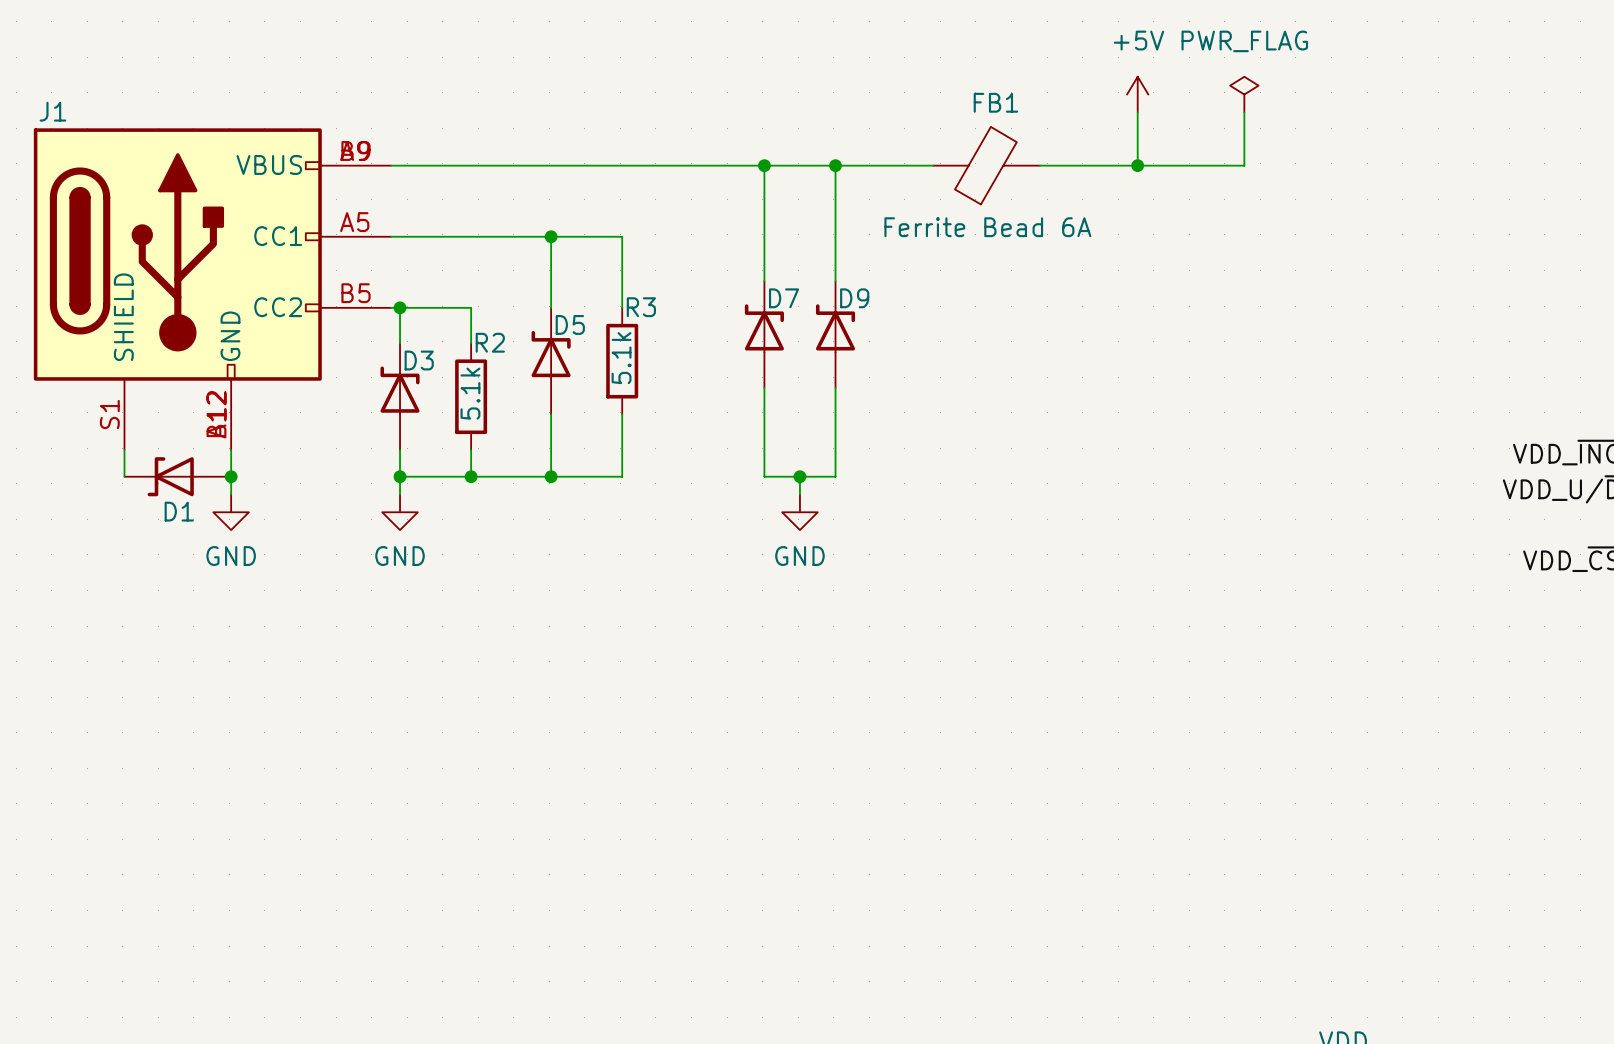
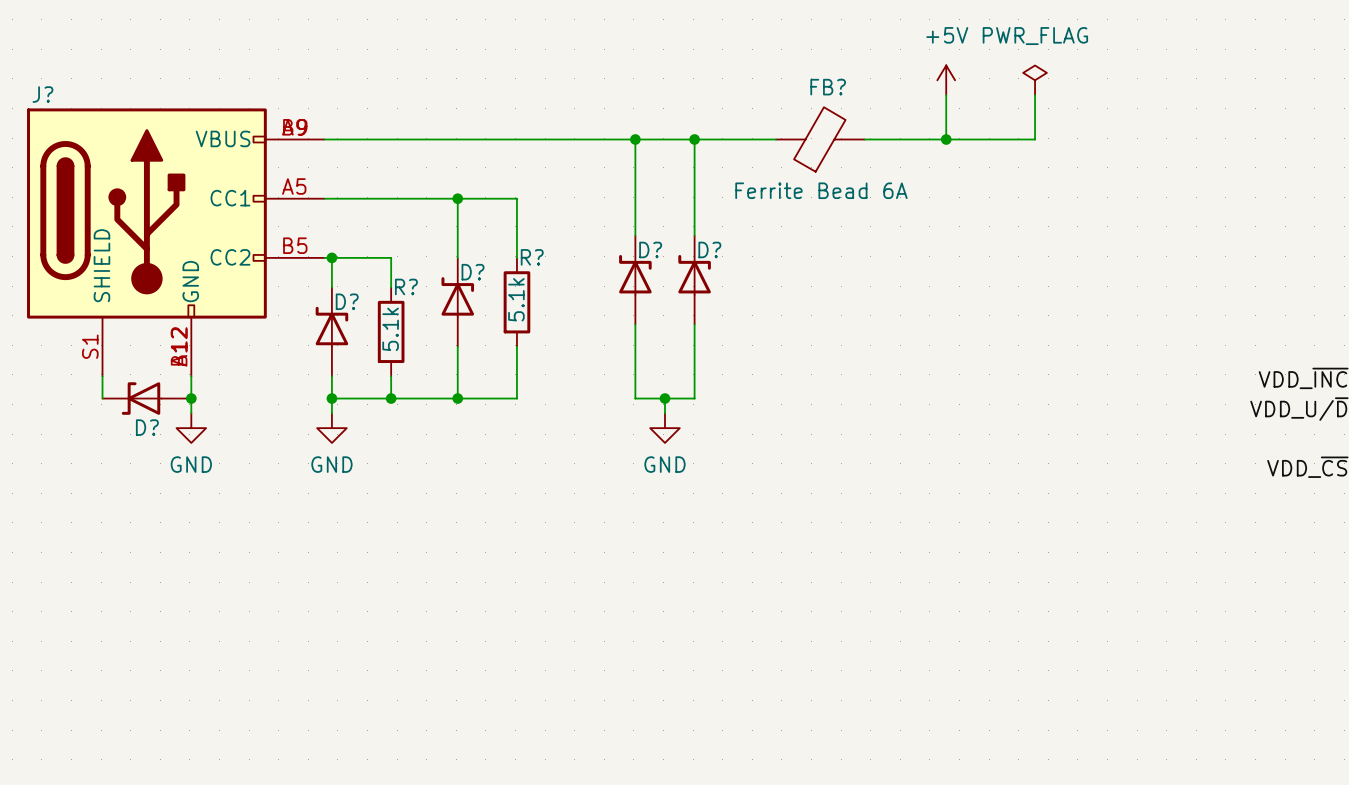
FB1 name: FB1 (995, 102) -> FB? (828, 87)
J1 name: J1 (52, 111) -> J? (42, 94)
D7 name: D7 (784, 298) -> D? (650, 249)
D9 name: D9 (854, 298) -> D? (709, 249)
R3 name: R3 (641, 307) -> R? (532, 257)
D5 name: D5 (570, 324) -> D? (473, 272)
R2 name: R2 (490, 342) -> R? (406, 286)
D3 name: D3 (419, 360) -> D? (347, 301)
D1 name: D1 (179, 511) -> D? (147, 427)

